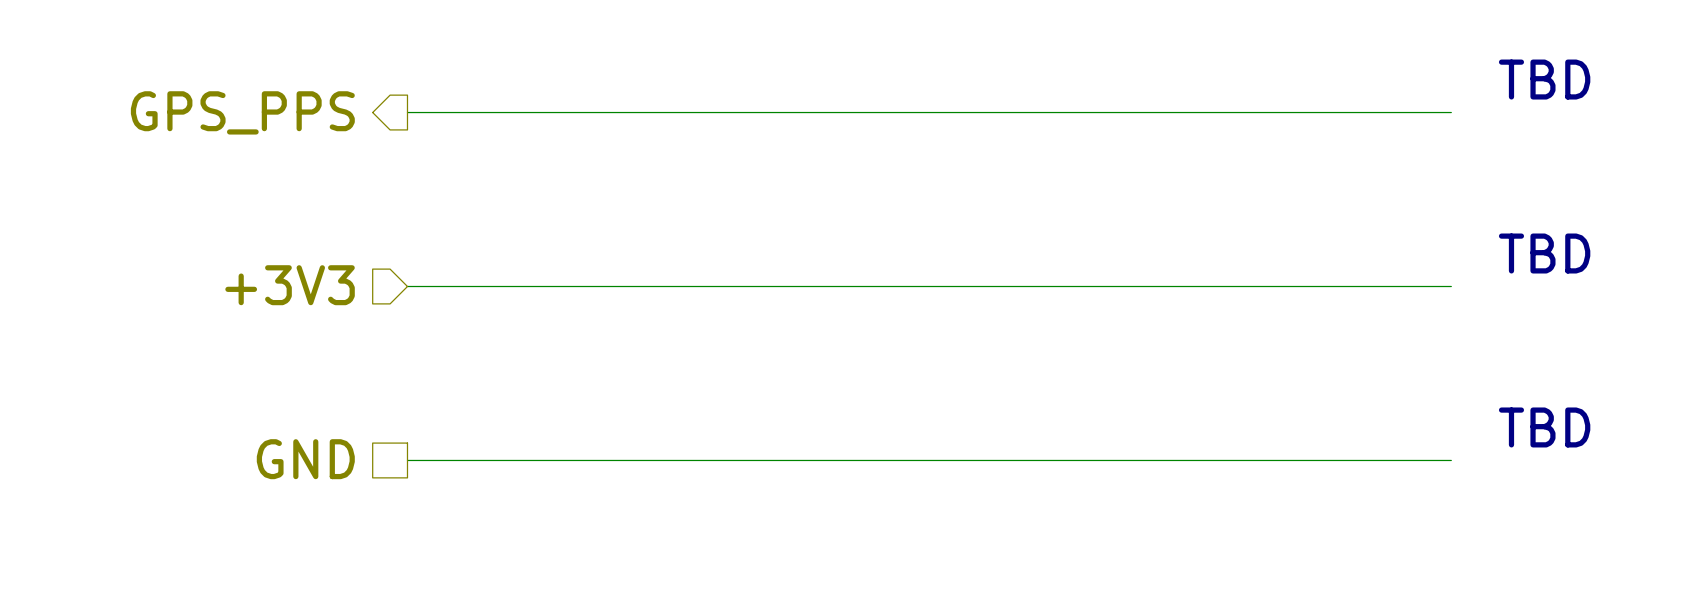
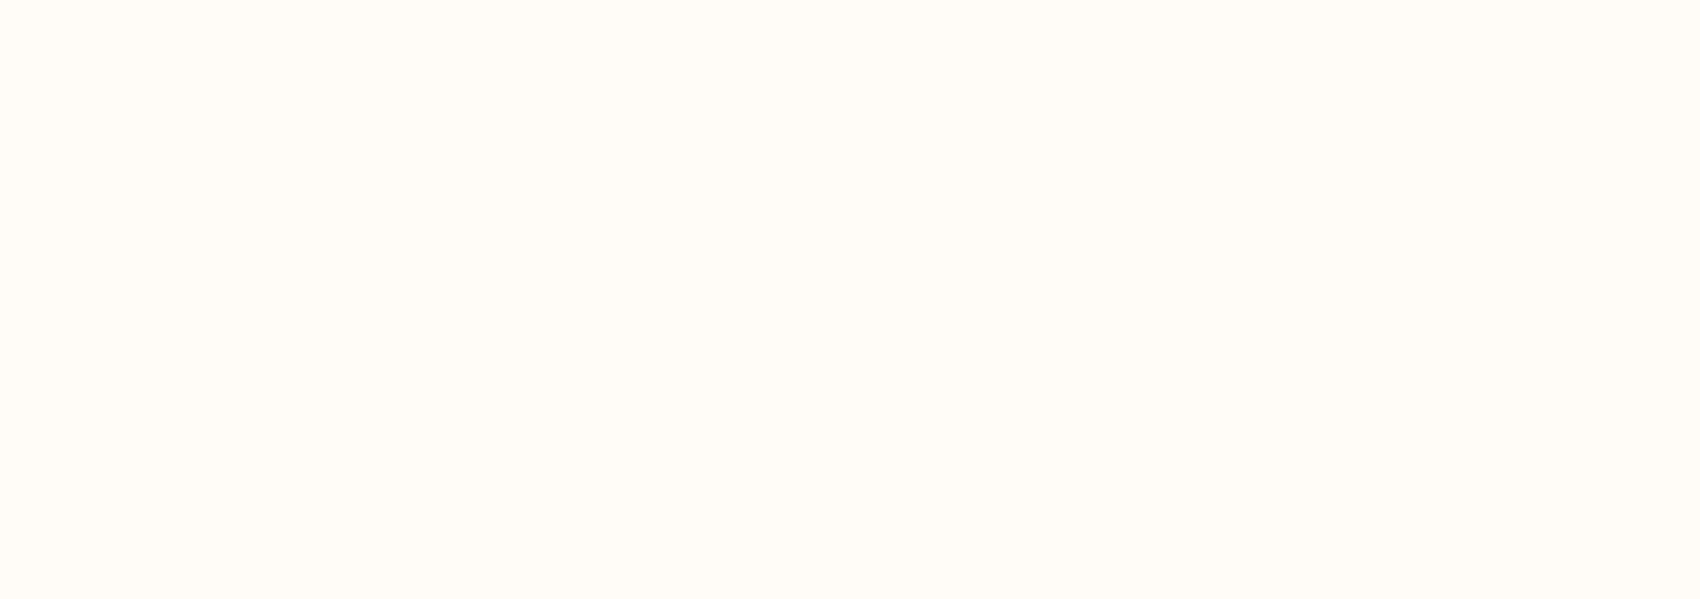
text: TBD (1544, 79) -> none
hierarchical label: GPS_PPS (242, 112) -> none
wire: (407, 112) (1451, 112) -> none
text: TBD (1544, 253) -> none
hierarchical label: +3V3 (290, 285) -> none
wire: (407, 286) (1451, 286) -> none
text: TBD (1544, 427) -> none
hierarchical label: GND (305, 459) -> none
wire: (407, 460) (1451, 460) -> none

